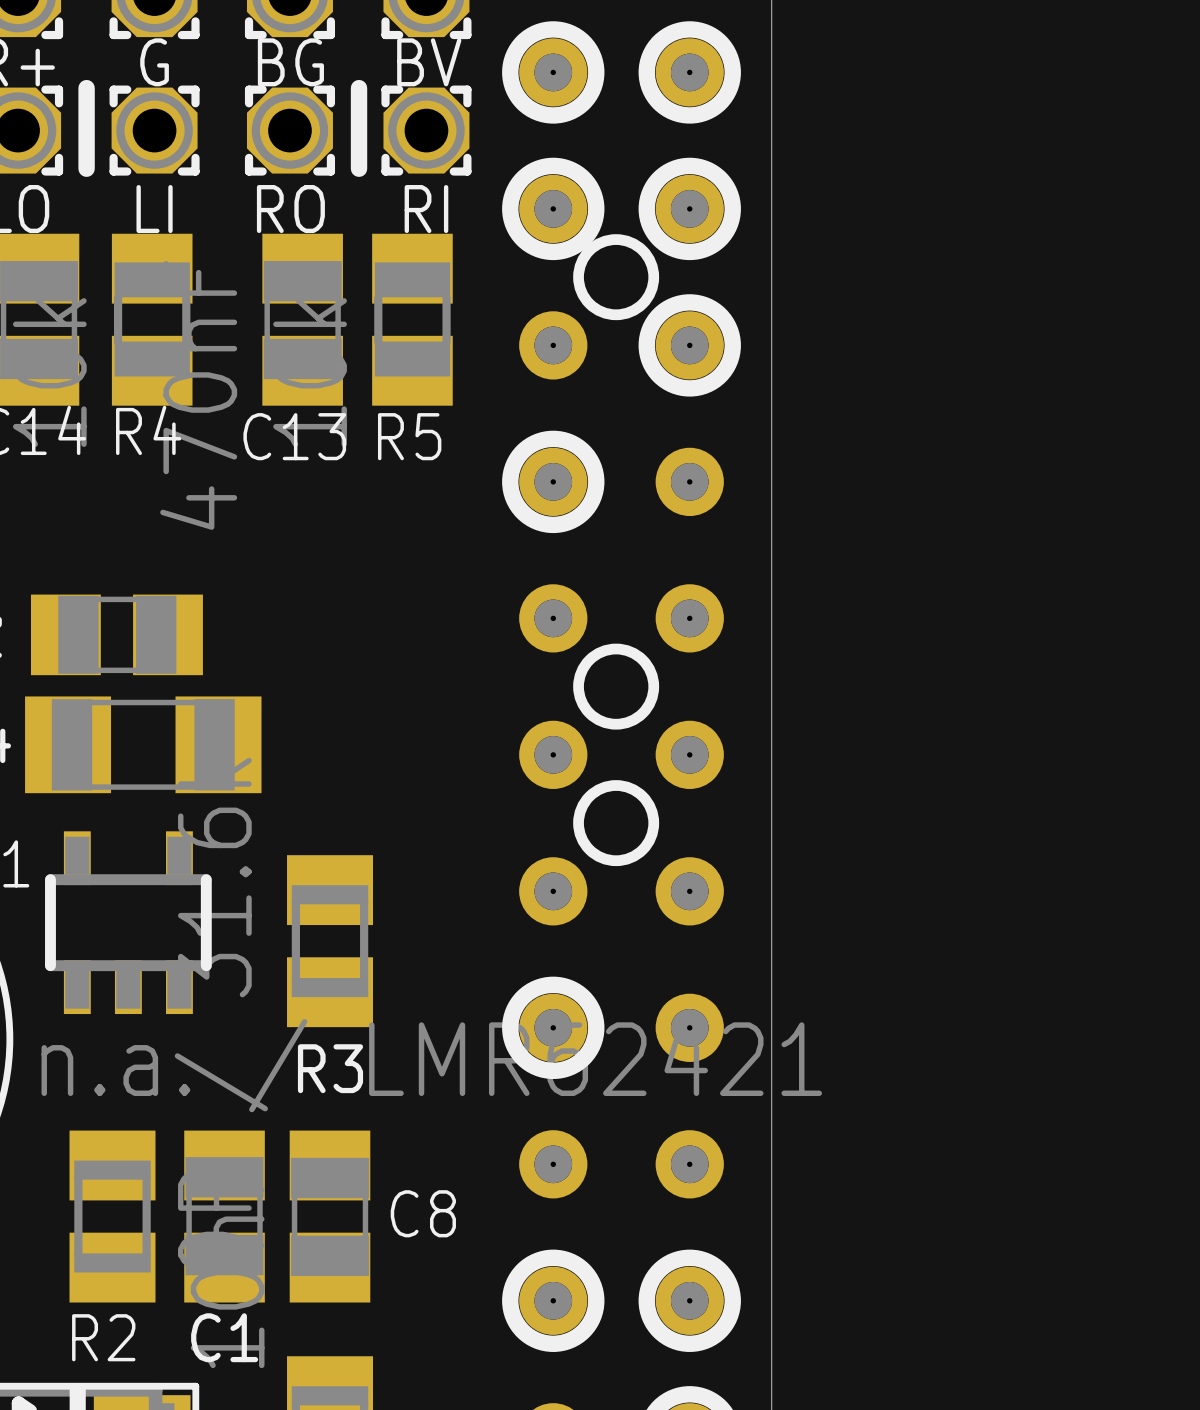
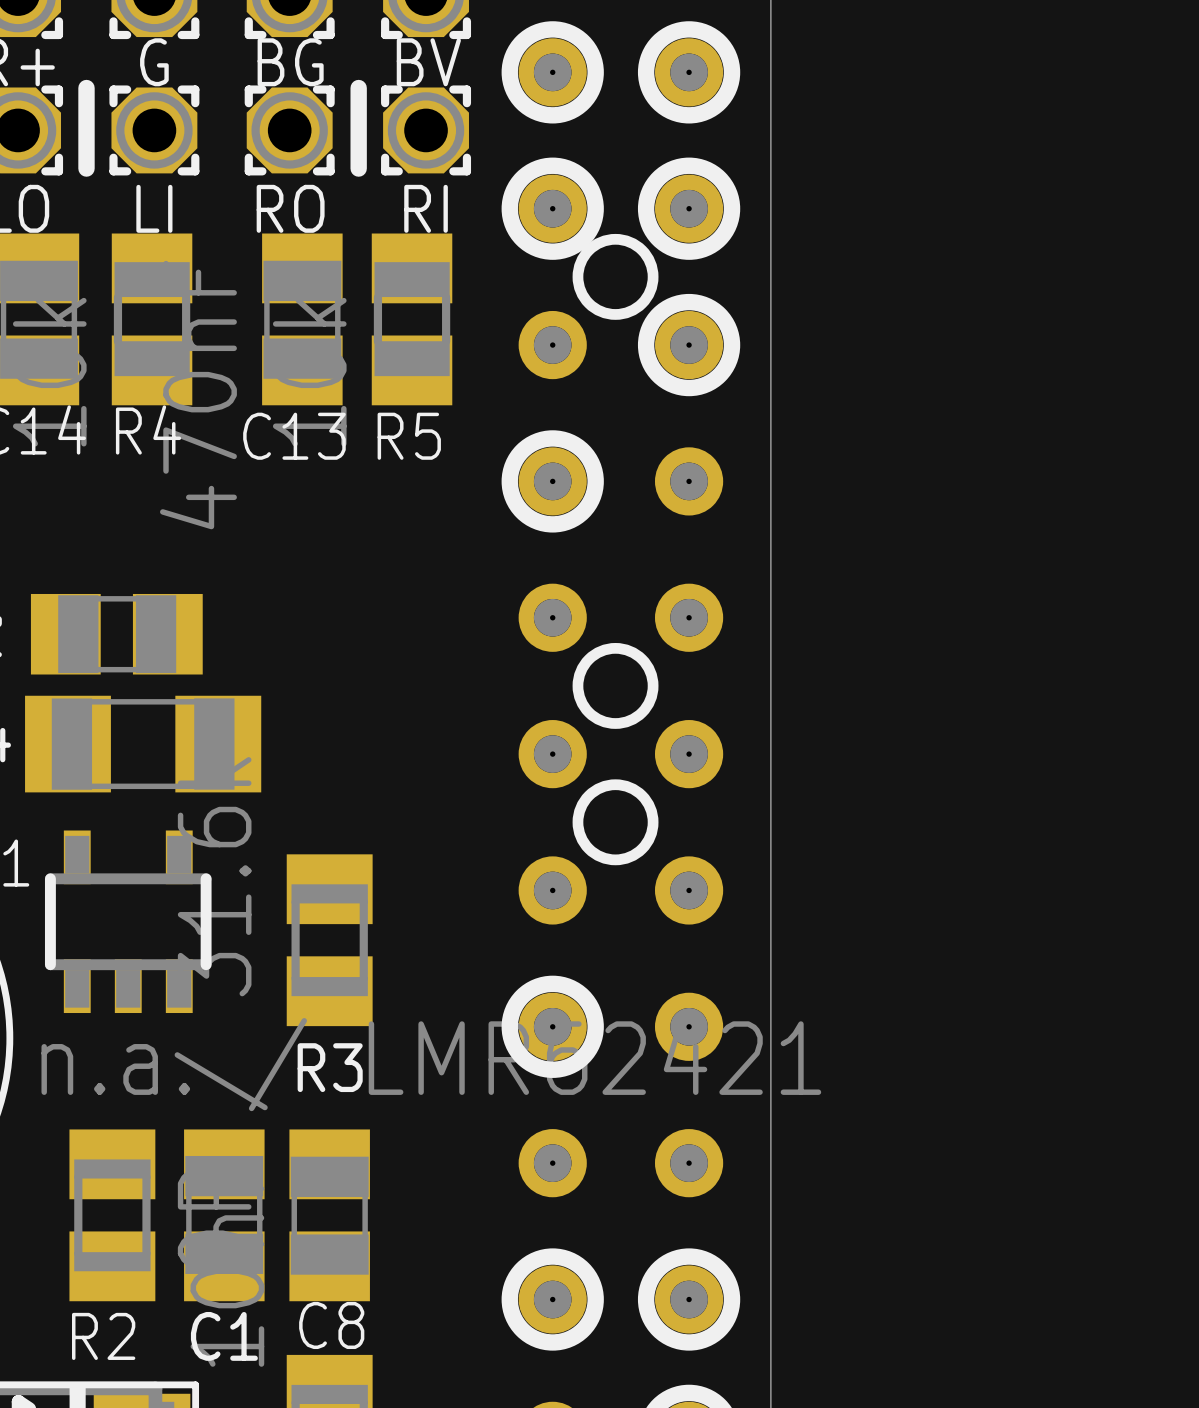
C8 name position: C8 (423, 1213) -> C8 (331, 1325)

